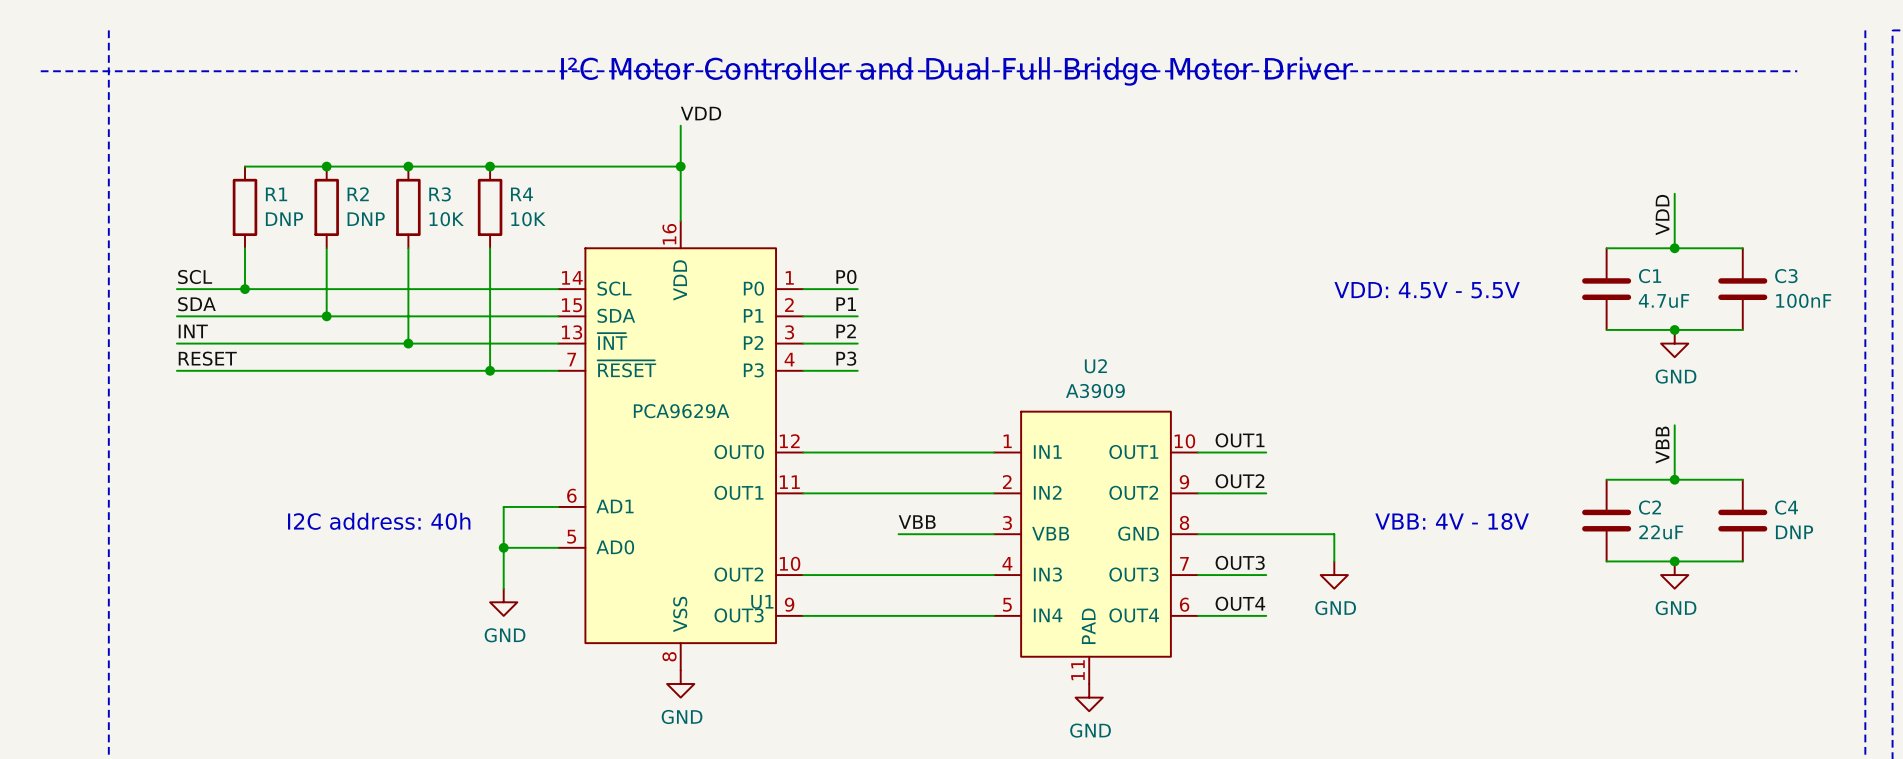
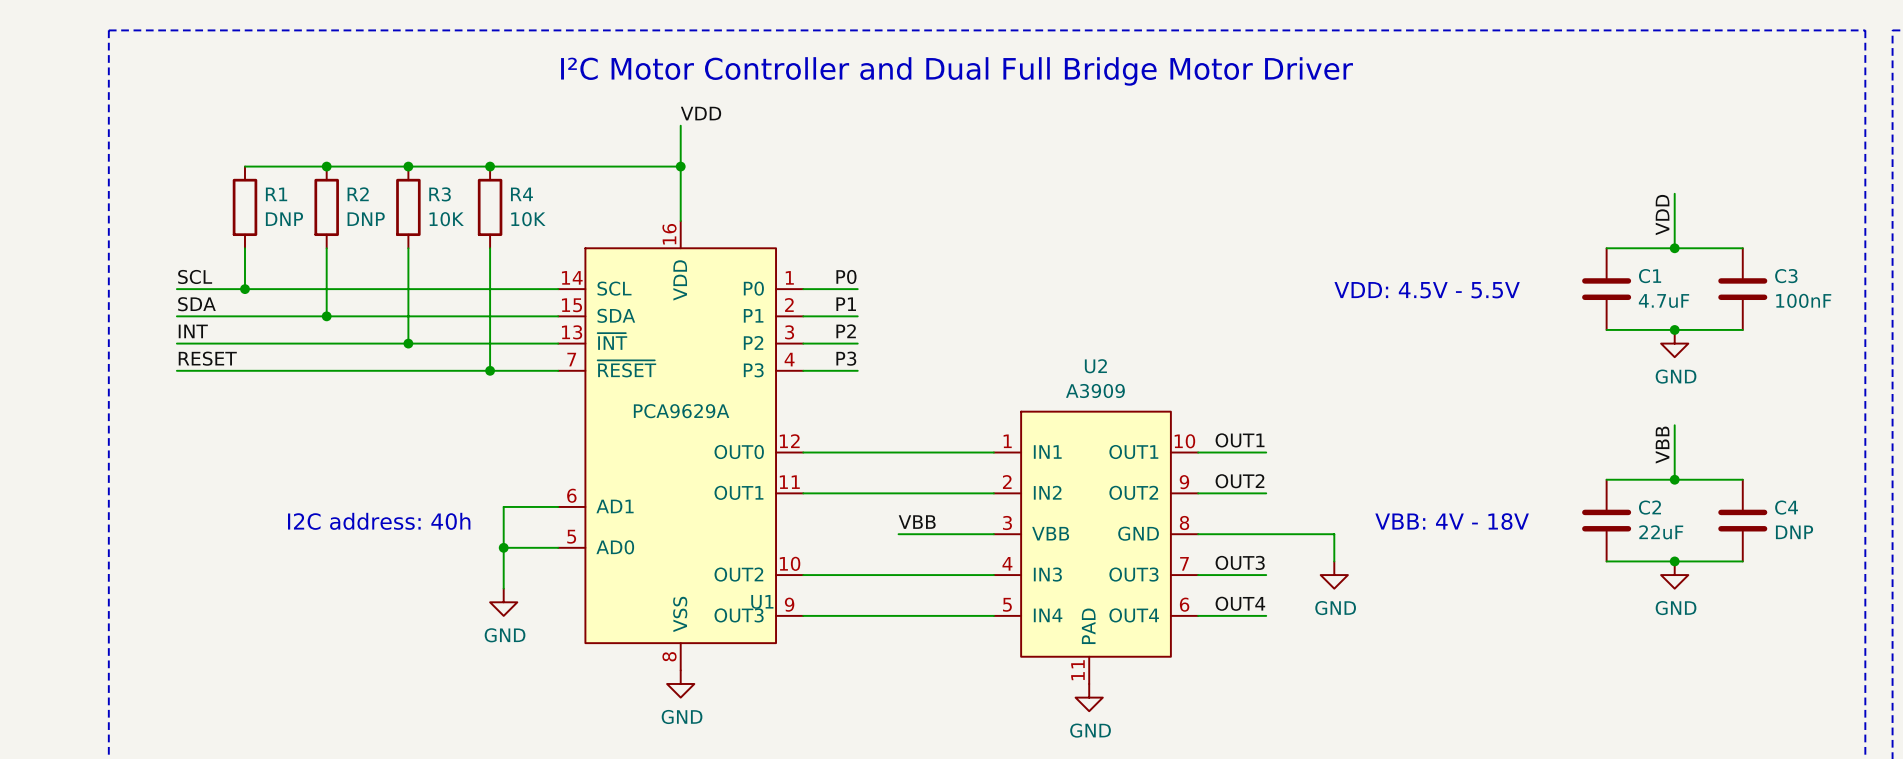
line: (40, 71) (1797, 71) -> (108, 30) (1865, 30)

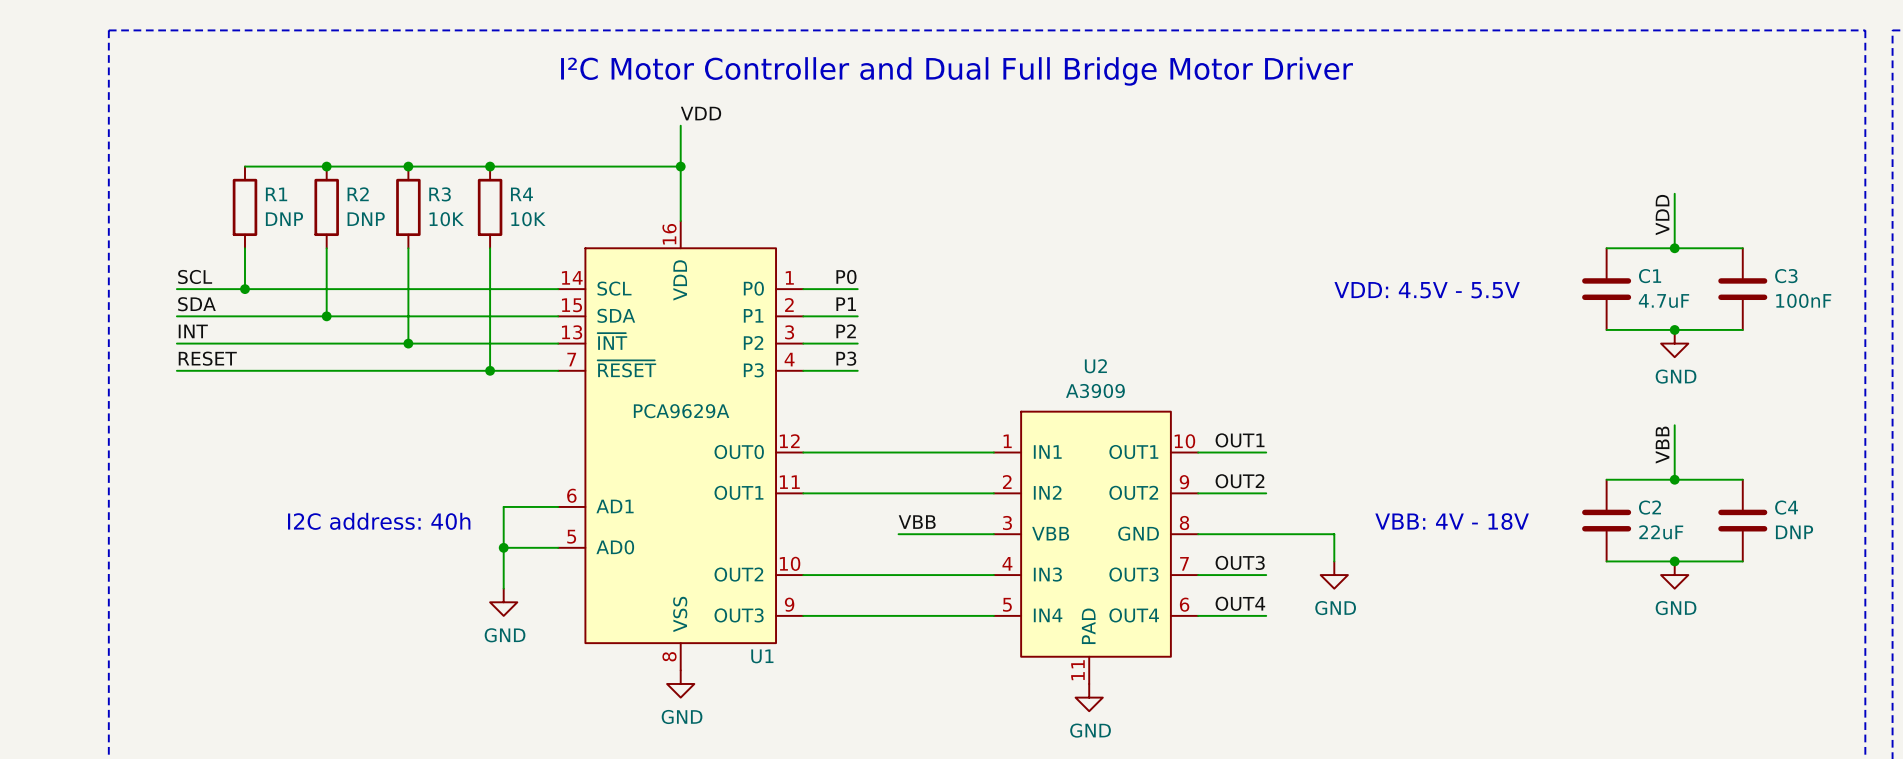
U1 name position: U1 (762, 601) -> U1 (762, 656)

